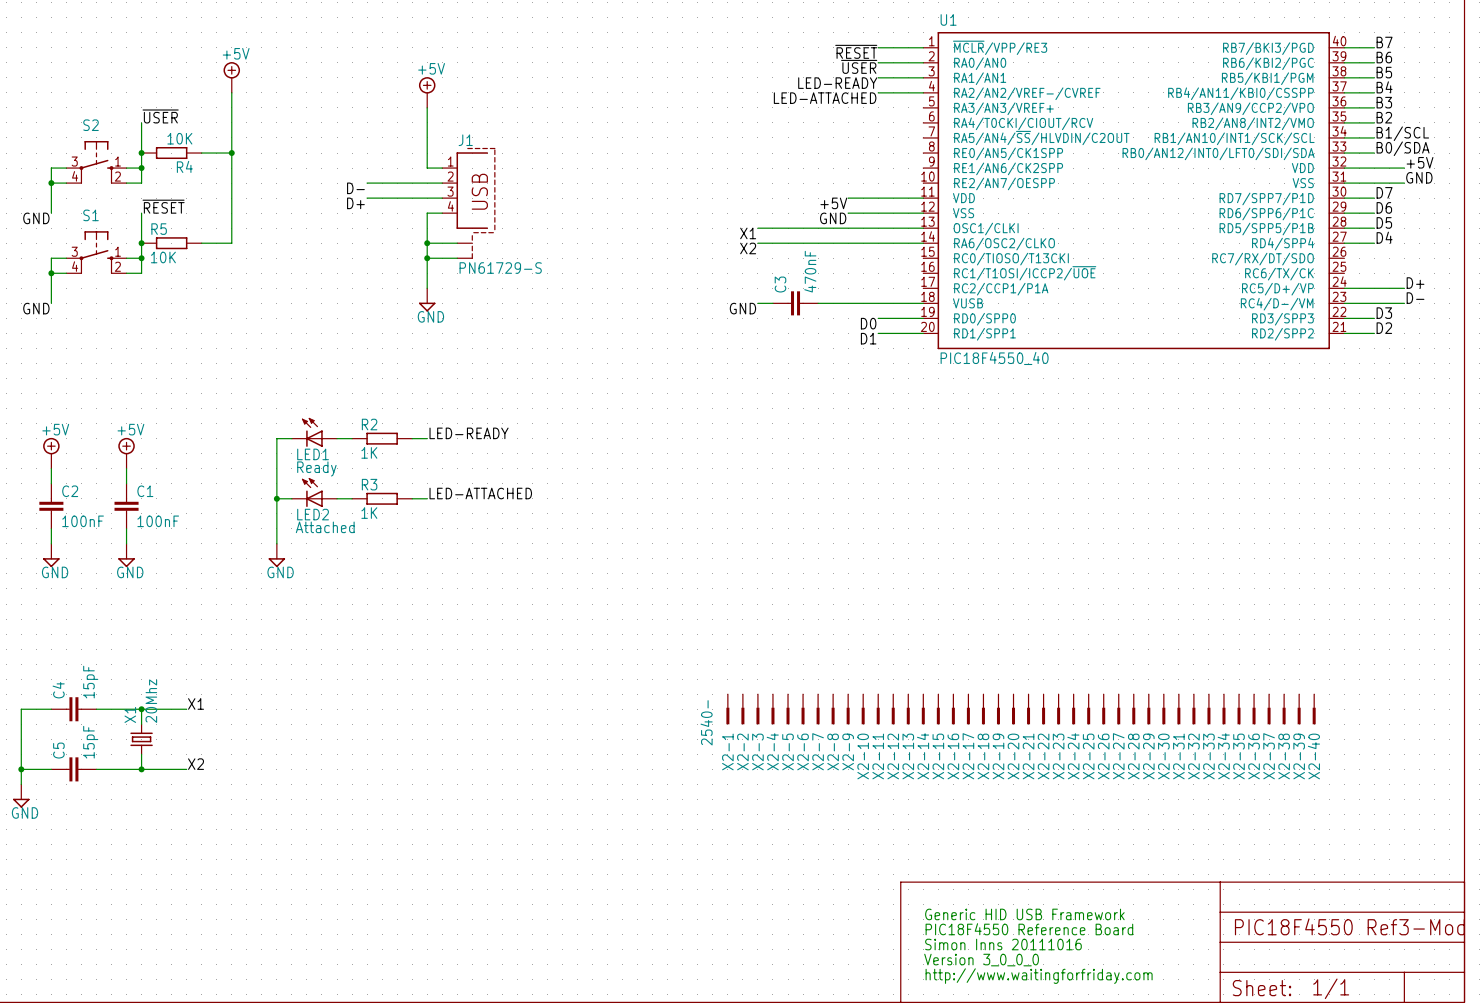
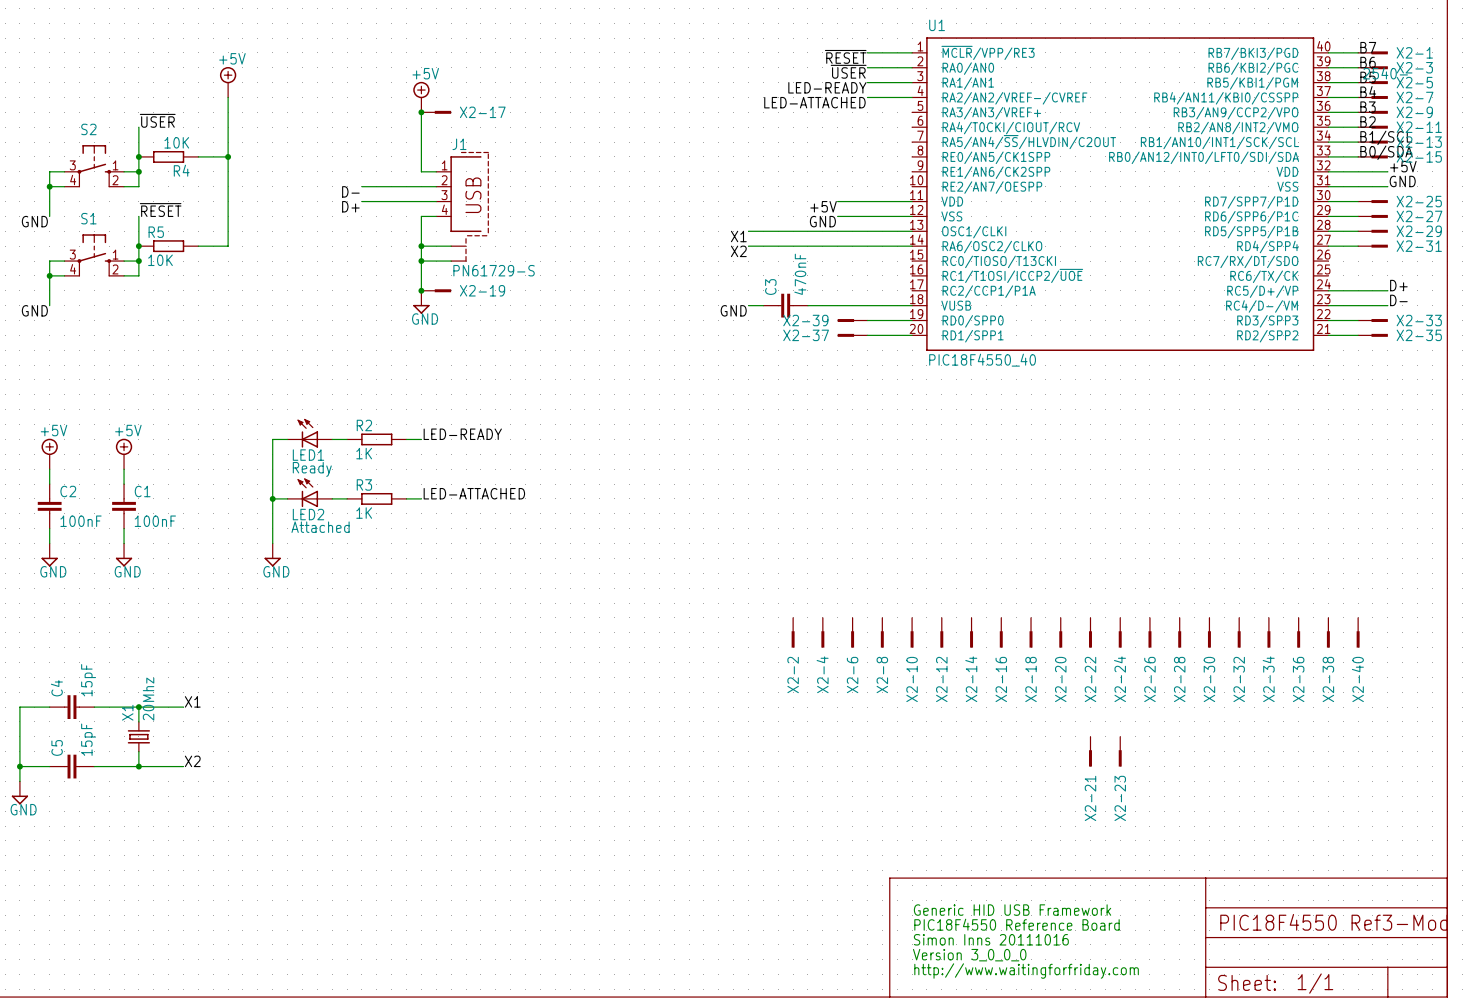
junction: none -> (421, 112)
label: D7 (1384, 192) -> none
label: D6 (1384, 207) -> none
label: D5 (1384, 222) -> none
label: D4 (1384, 237) -> none
junction: none -> (421, 290)
label: D3 (1384, 313) -> none
label: D0 (868, 323) -> none
label: D2 (1384, 328) -> none
label: D1 (868, 338) -> none
X2-1 position: (727, 709) -> (1372, 52)
X2-2 position: (742, 709) -> (793, 632)
X2-3 position: (757, 709) -> (1372, 67)
X2-4 position: (772, 709) -> (822, 632)
X2-5 position: (788, 709) -> (1372, 82)
X2-6 position: (803, 709) -> (852, 632)
X2-7 position: (818, 709) -> (1372, 97)
X2-8 position: (833, 709) -> (882, 632)
X2-9 position: (848, 709) -> (1372, 112)
X2-10 position: (863, 709) -> (912, 632)
X2-11 position: (878, 709) -> (1372, 127)
X2-12 position: (893, 709) -> (941, 632)
X2-13 position: (908, 709) -> (1372, 142)
X2-14 position: (923, 709) -> (971, 632)
X2-15 position: (938, 709) -> (1372, 156)
X2-16 position: (953, 709) -> (1001, 632)
X2-17 position: (968, 709) -> (436, 112)
X2-18 position: (983, 709) -> (1031, 632)
X2-19 position: (998, 709) -> (436, 290)
X2-20 position: (1013, 709) -> (1060, 632)
X2-21 position: (1028, 709) -> (1090, 751)
X2-22 position: (1043, 709) -> (1090, 632)
X2-23 position: (1058, 709) -> (1120, 751)
X2-24 position: (1073, 709) -> (1120, 632)
X2-25 position: (1088, 709) -> (1372, 201)
X2-26 position: (1103, 709) -> (1149, 632)
X2-27 position: (1118, 709) -> (1372, 216)
X2-28 position: (1133, 709) -> (1179, 632)
X2-29 position: (1148, 709) -> (1372, 231)
X2-30 position: (1163, 709) -> (1209, 632)
X2-31 position: (1178, 709) -> (1372, 246)
X2-32 position: (1193, 709) -> (1239, 632)
X2-33 position: (1208, 709) -> (1372, 320)
X2-34 position: (1223, 709) -> (1268, 632)
X2-35 position: (1239, 709) -> (1372, 335)
X2-36 position: (1254, 709) -> (1298, 632)
X2-37 position: (1269, 709) -> (852, 335)
X2-38 position: (1284, 709) -> (1328, 632)
X2-39 position: (1299, 709) -> (852, 320)
X2-40 position: (1314, 709) -> (1358, 632)
X2-1 rotation: 0° (727, 716) -> 90° counterclockwise (1379, 52)
X2-3 rotation: 0° (757, 716) -> 90° counterclockwise (1379, 67)
X2-5 rotation: 0° (788, 716) -> 90° counterclockwise (1379, 82)
X2-7 rotation: 0° (818, 716) -> 90° counterclockwise (1379, 97)
X2-9 rotation: 0° (848, 716) -> 90° counterclockwise (1379, 112)
X2-11 rotation: 0° (878, 716) -> 90° counterclockwise (1379, 127)
X2-13 rotation: 0° (908, 716) -> 90° counterclockwise (1379, 142)
X2-15 rotation: 0° (938, 716) -> 90° counterclockwise (1379, 156)
X2-17 rotation: 0° (968, 716) -> 90° counterclockwise (442, 112)
X2-19 rotation: 0° (998, 716) -> 90° counterclockwise (442, 290)
X2-25 rotation: 0° (1088, 716) -> 90° counterclockwise (1379, 201)
X2-27 rotation: 0° (1118, 716) -> 90° counterclockwise (1379, 216)
X2-29 rotation: 0° (1148, 716) -> 90° counterclockwise (1379, 231)
X2-31 rotation: 0° (1178, 716) -> 90° counterclockwise (1379, 246)
X2-33 rotation: 0° (1208, 716) -> 90° counterclockwise (1379, 320)
X2-35 rotation: 0° (1239, 716) -> 90° counterclockwise (1379, 335)
X2-37 rotation: 0° (1269, 716) -> 90° clockwise (845, 335)
X2-39 rotation: 0° (1299, 716) -> 90° clockwise (845, 320)

